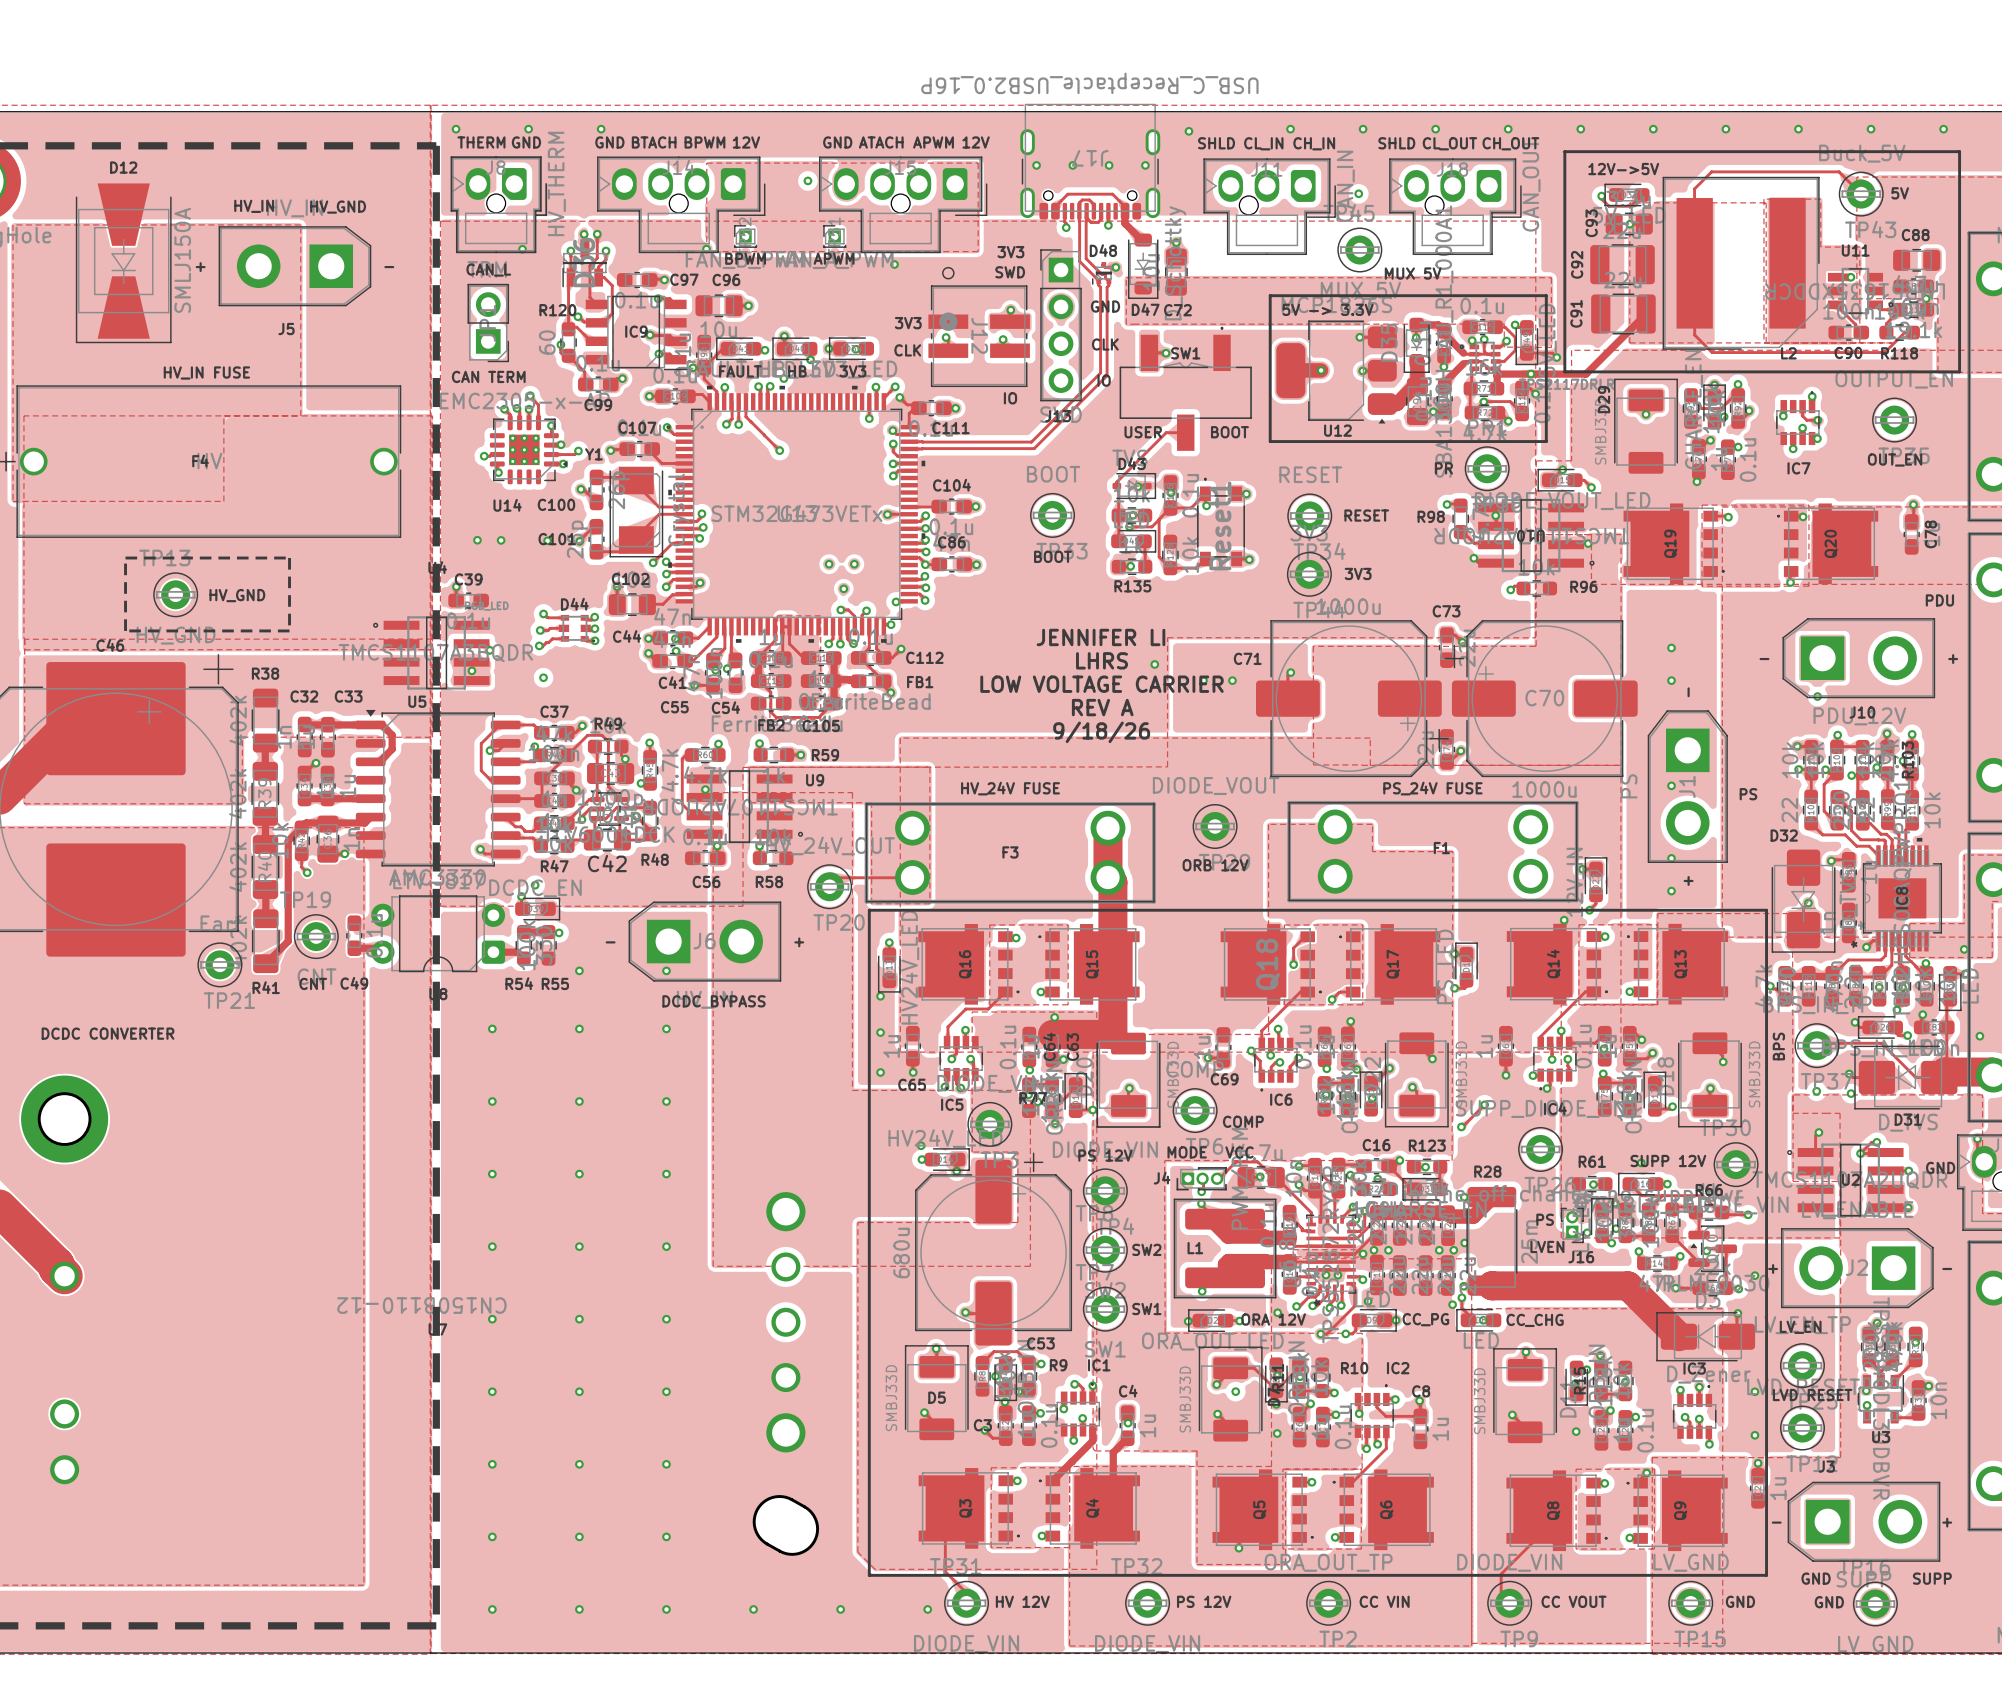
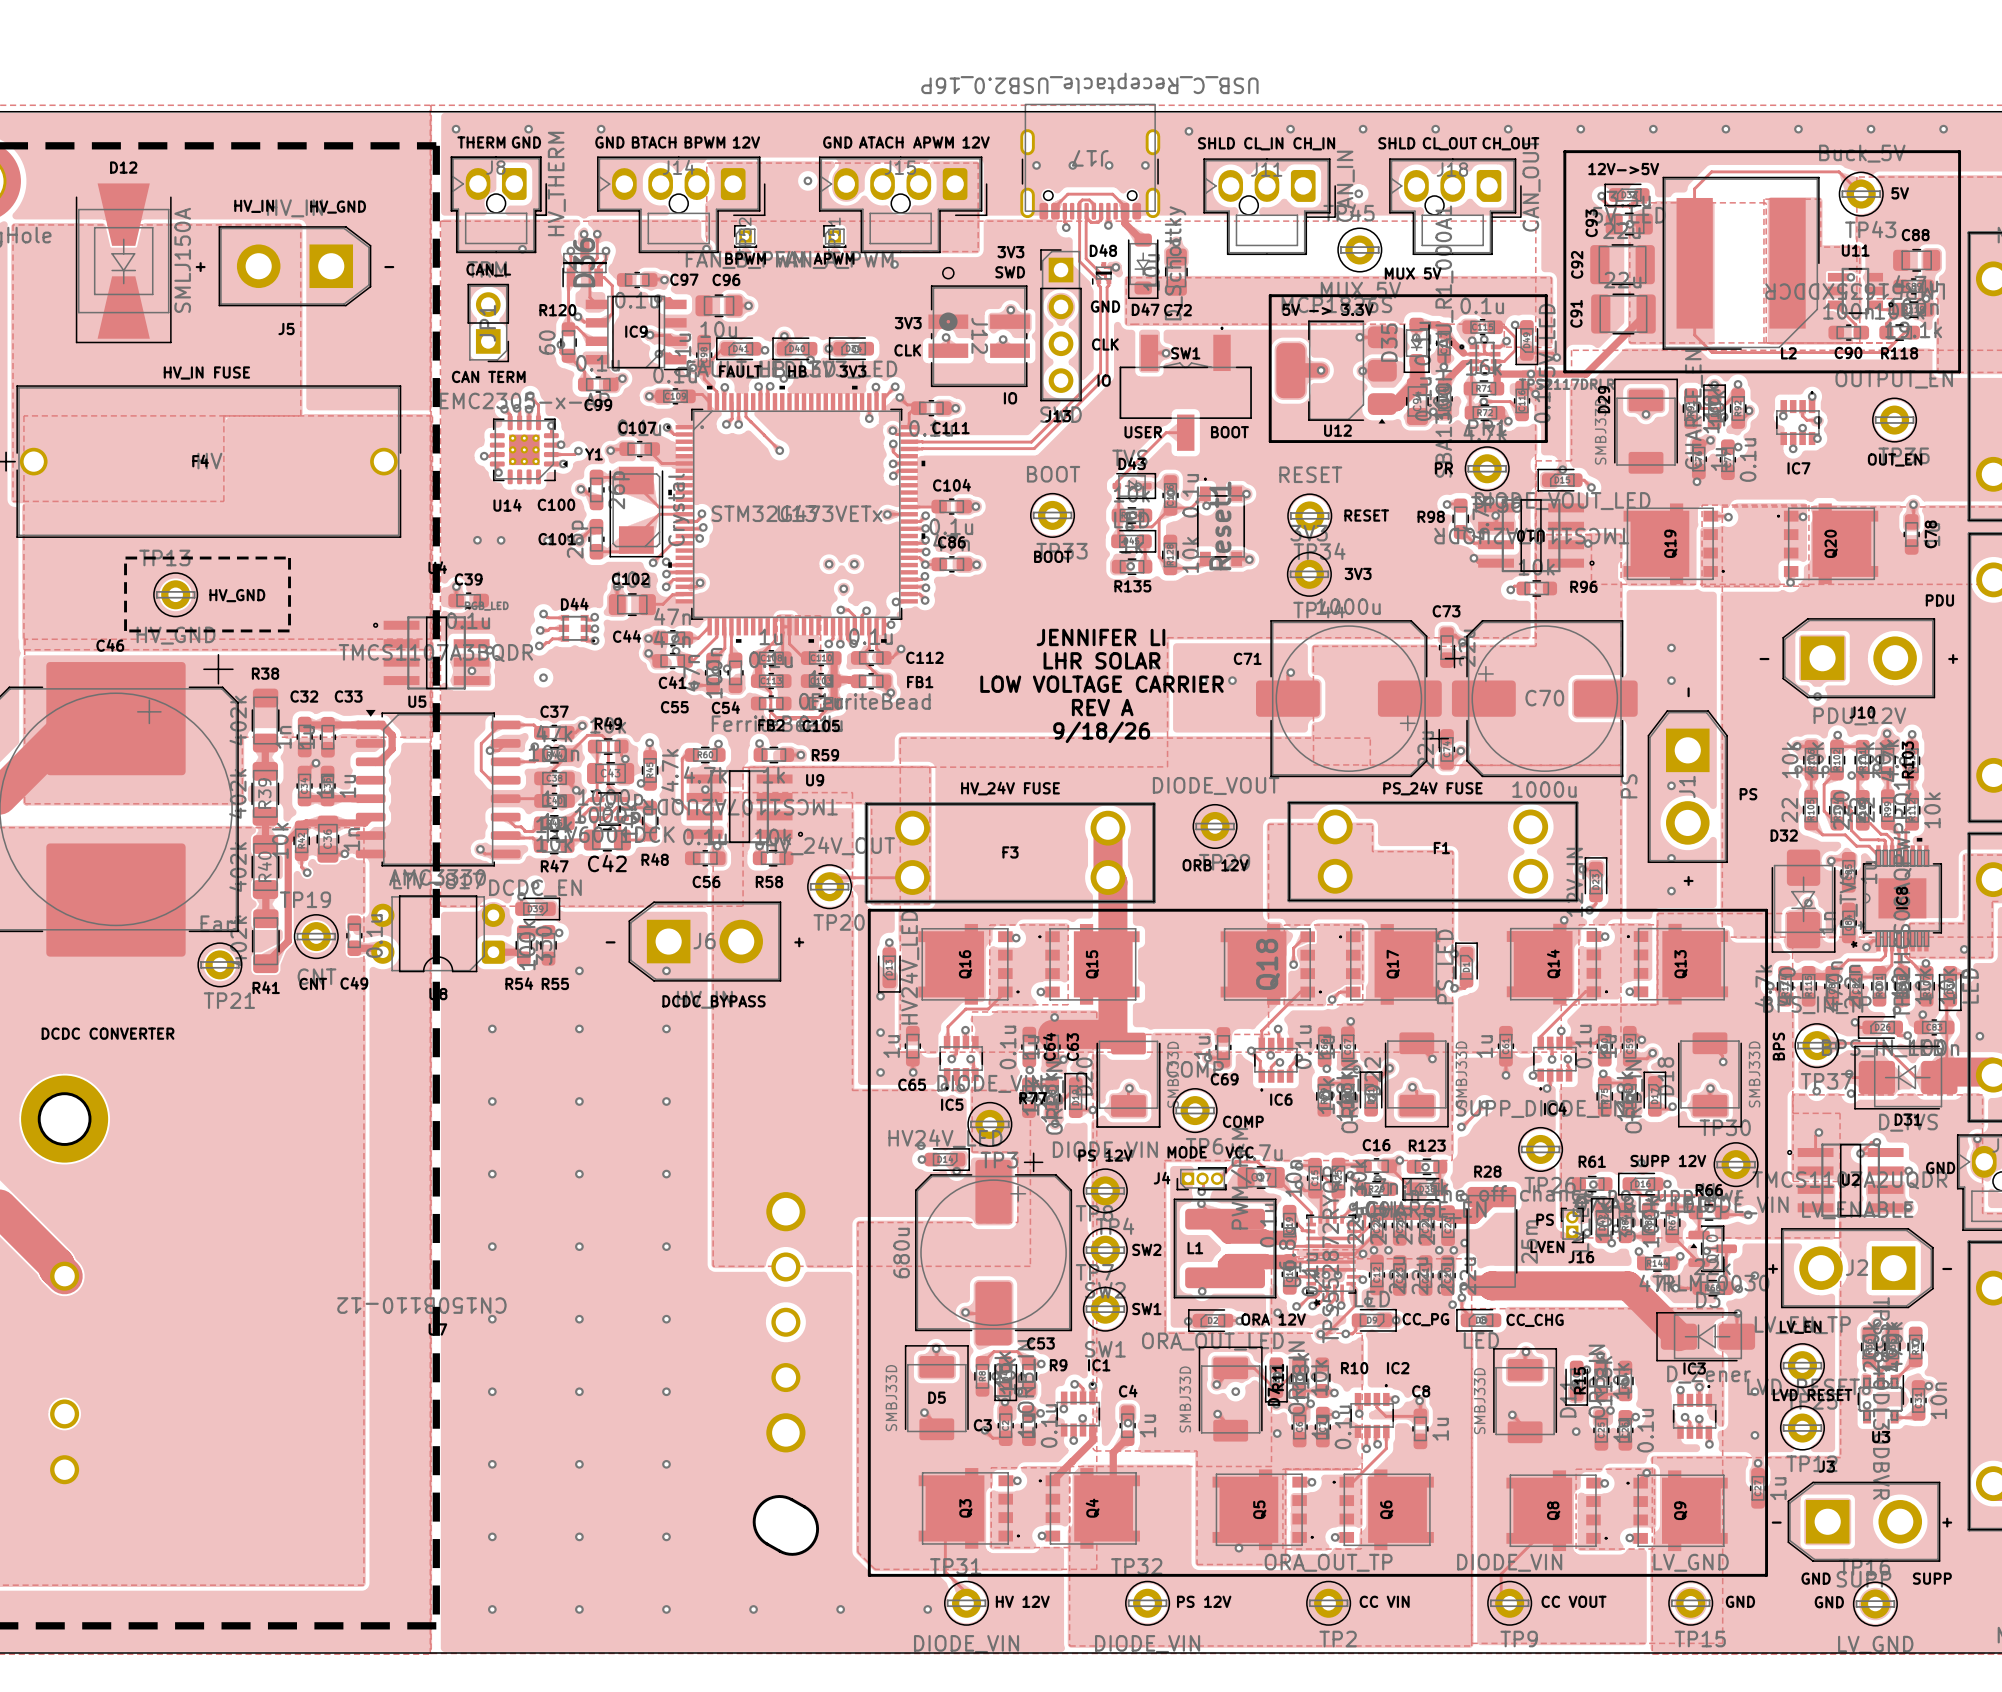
text: LHRS (1102, 660) -> LHR SOLAR (1102, 660)

